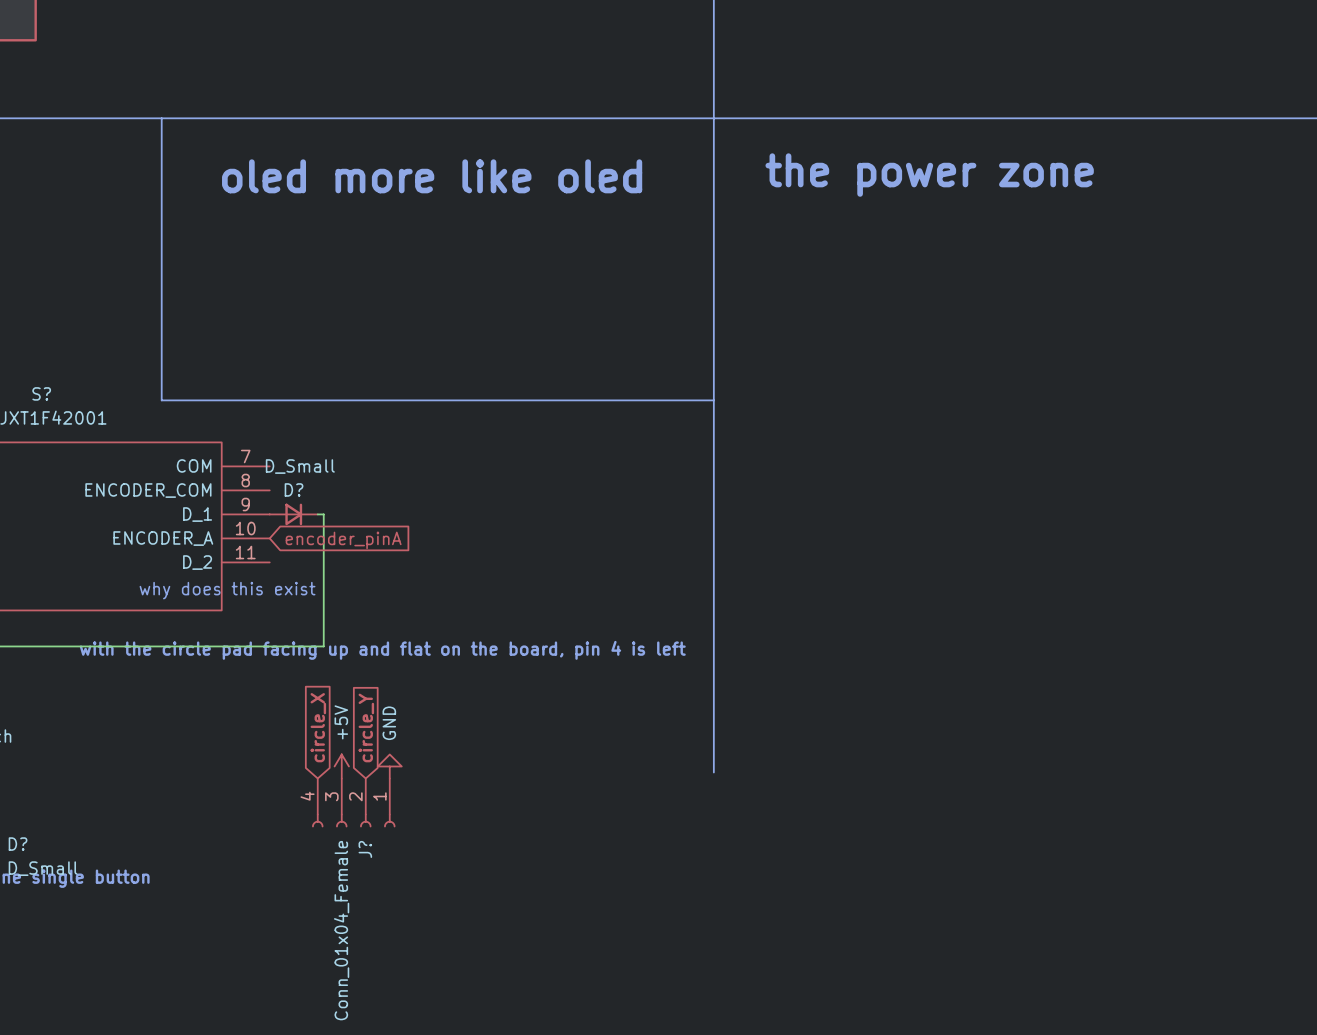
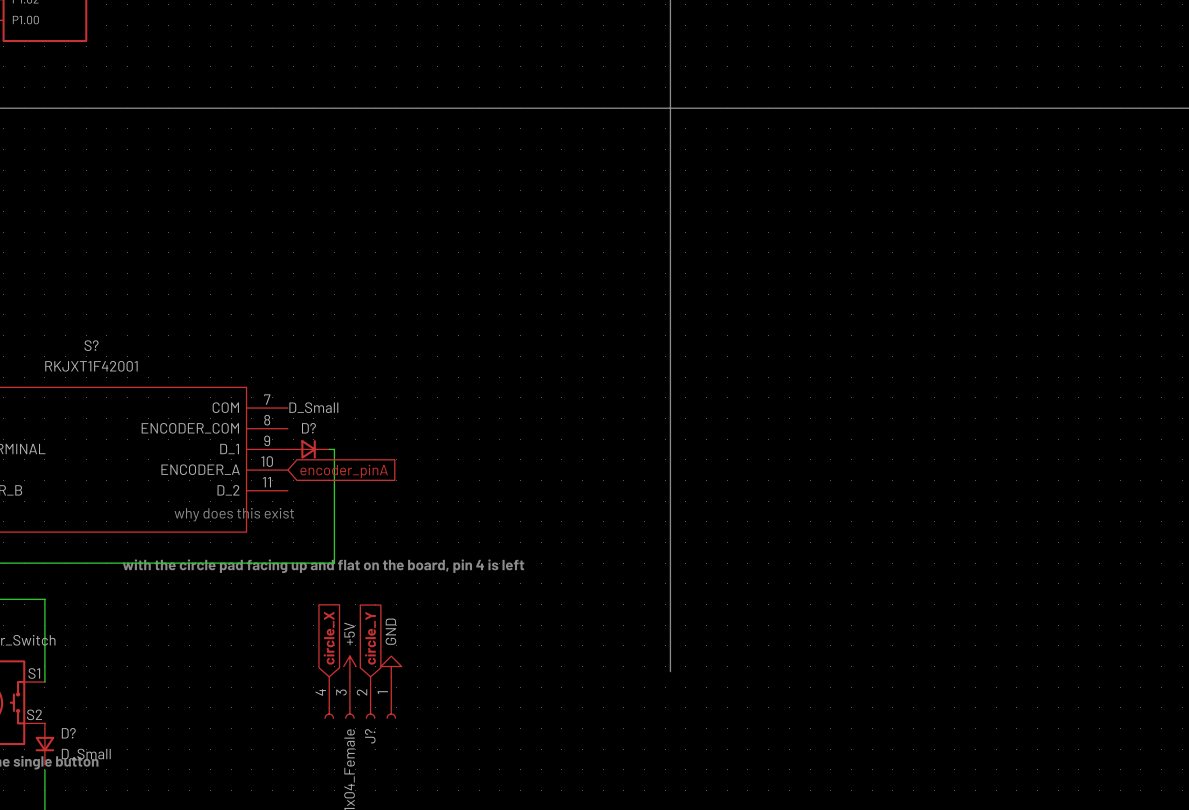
line: (161, 118) (161, 400) (713, 400) -> none
text: the power zone (929, 175) -> none
text: oled more like oled (432, 176) -> none

